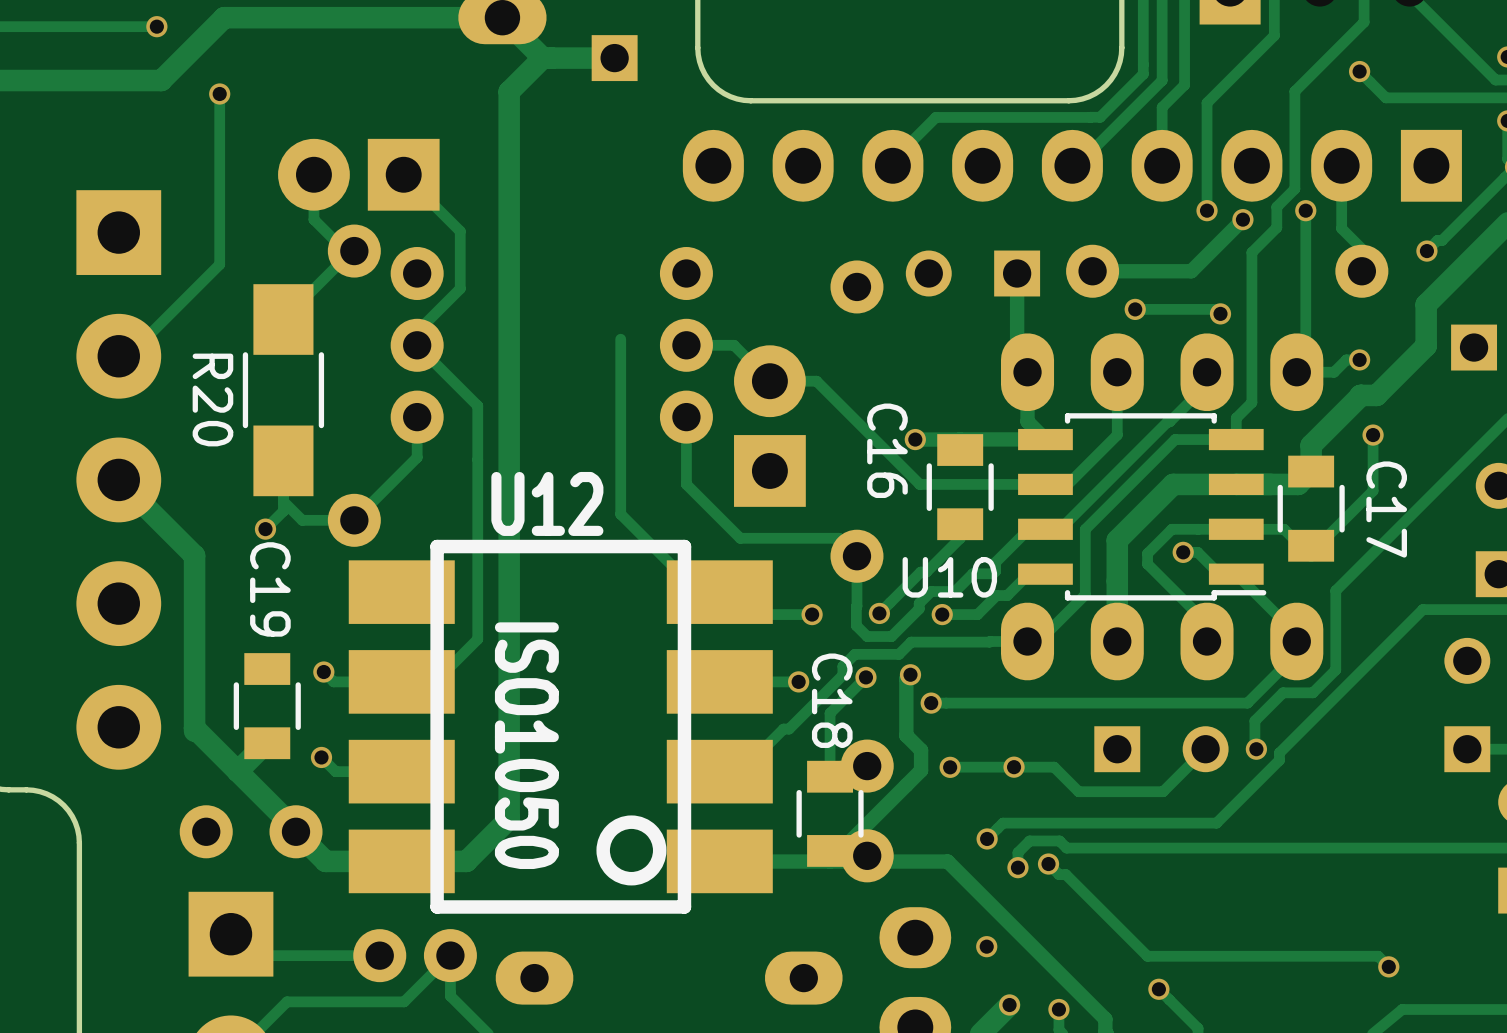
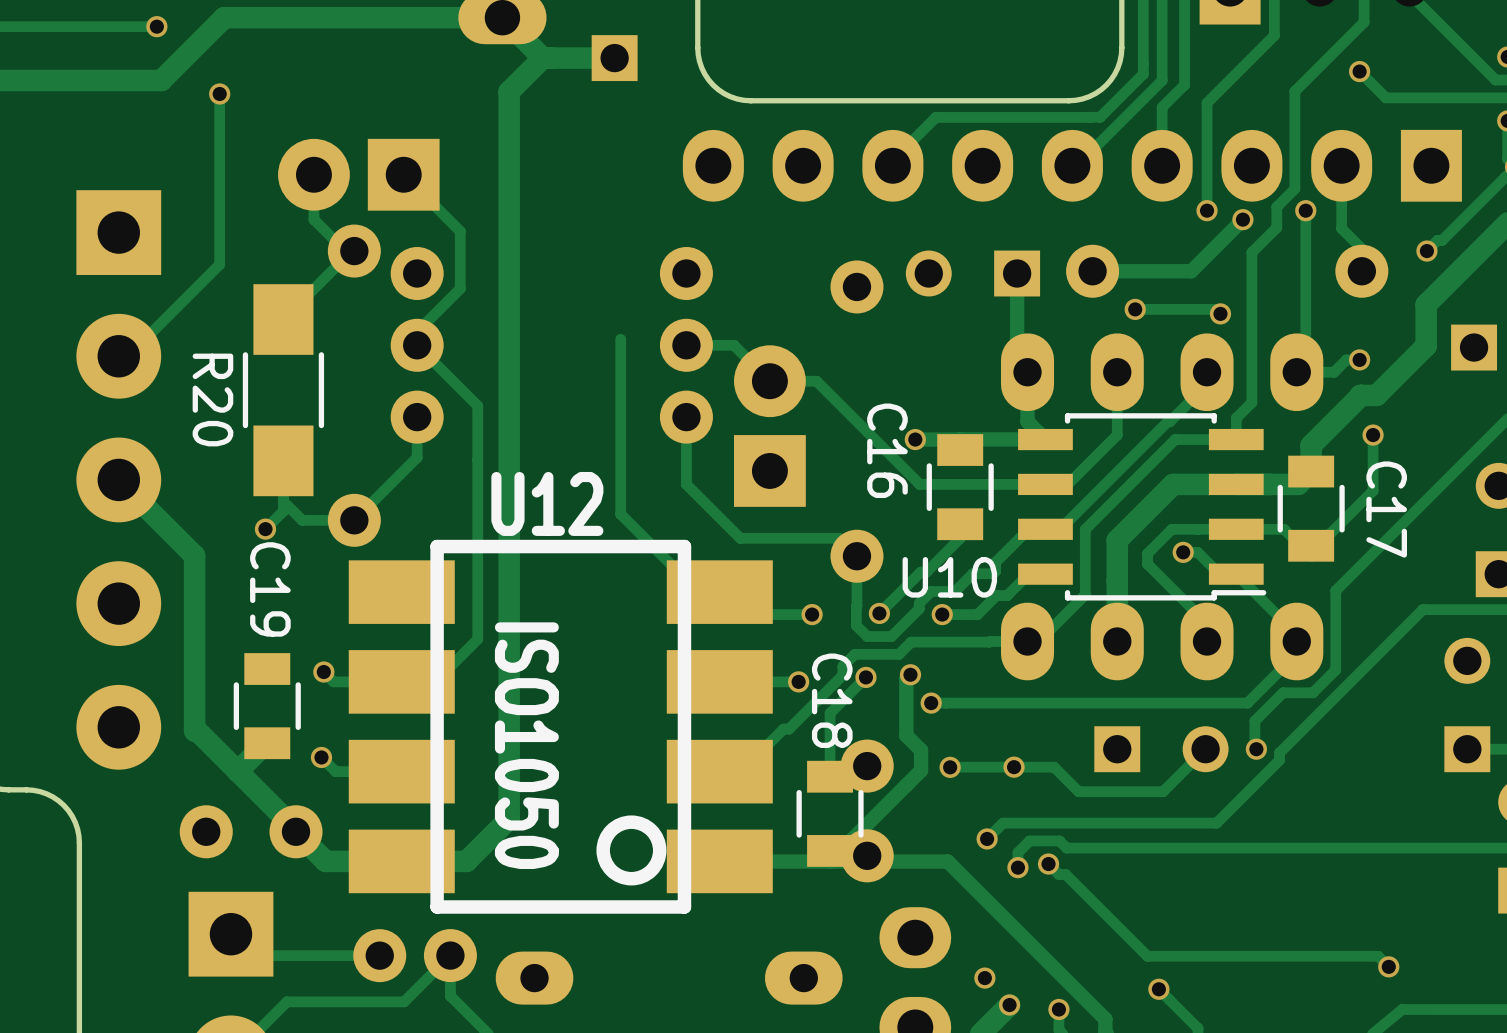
via position: (986, 946) -> (984, 978)

